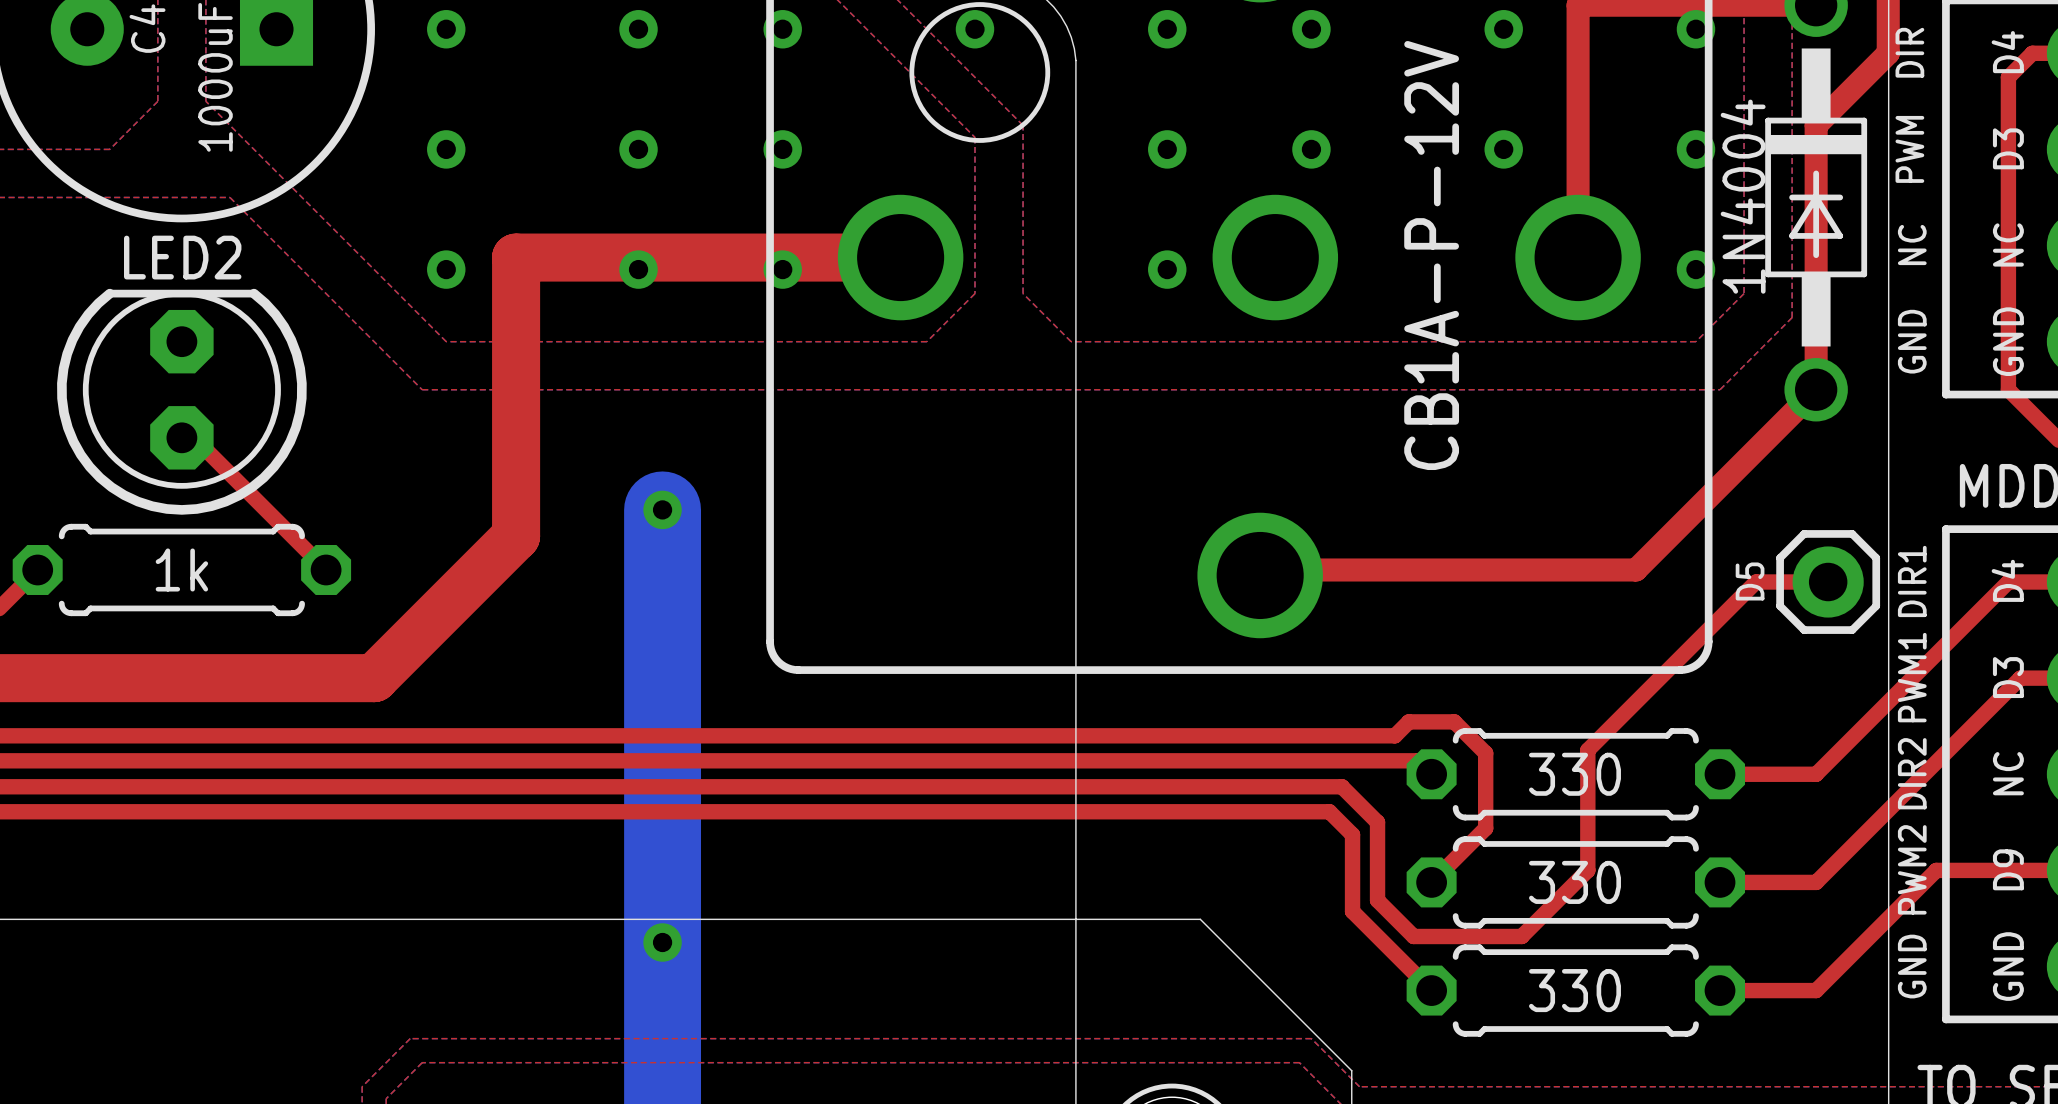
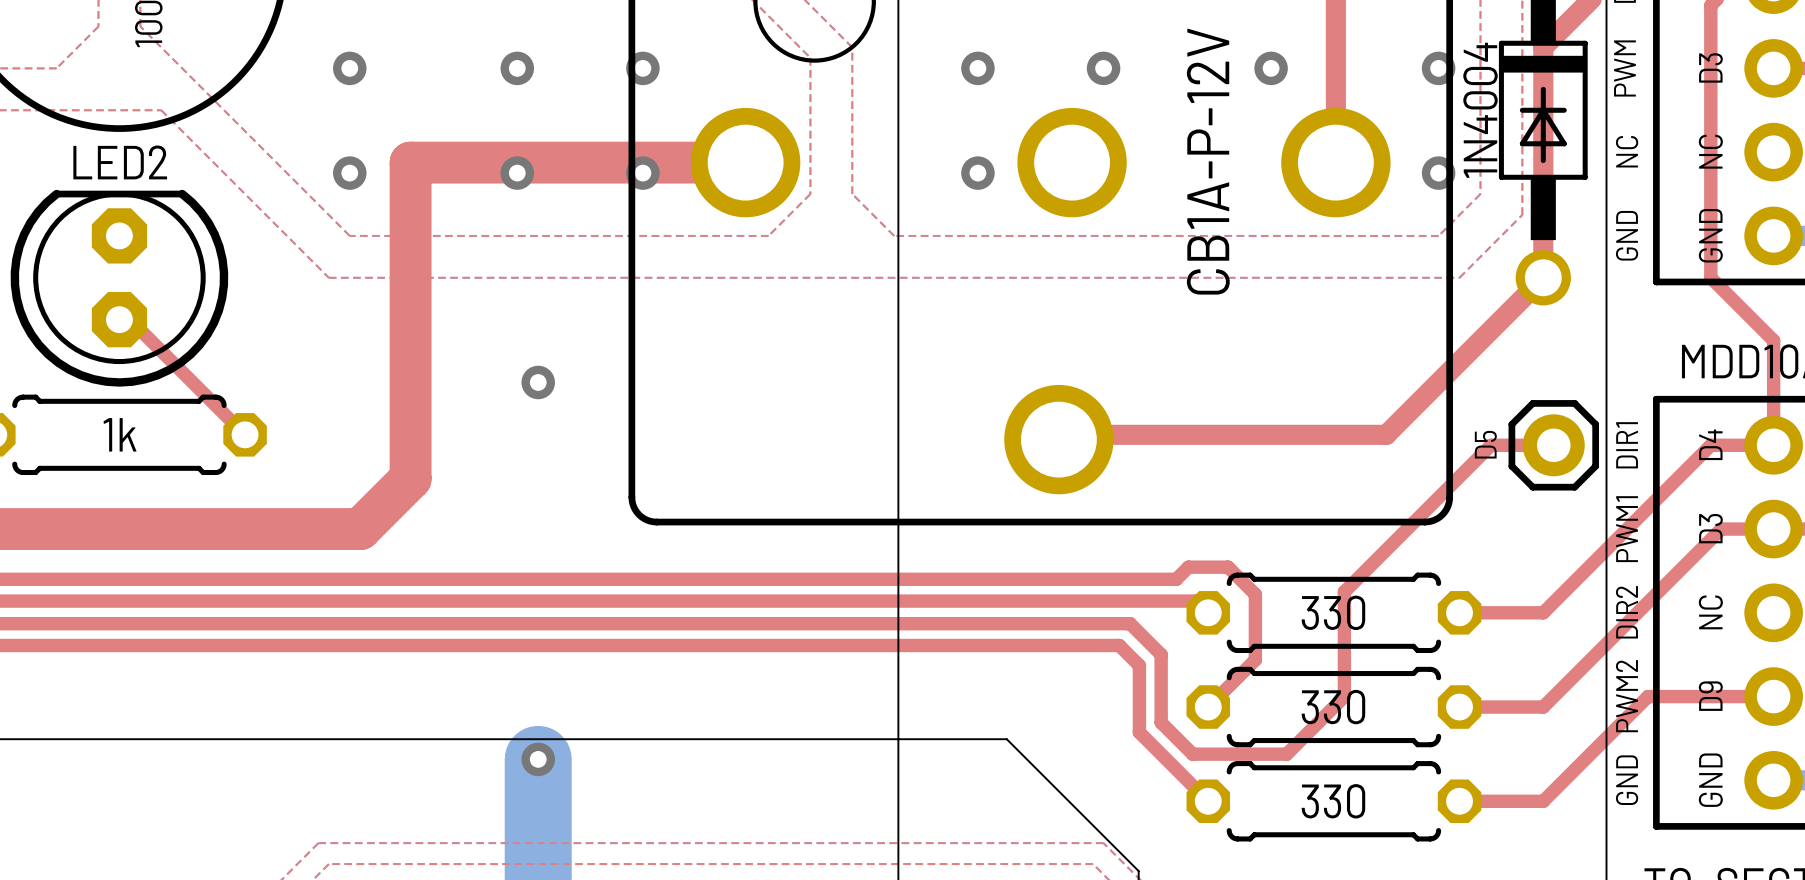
bottom track: (662, 509) (662, 942) -> none
top track: (516, 536) (374, 678) -> (410, 405) (410, 478) (360, 529) (286, 529)

